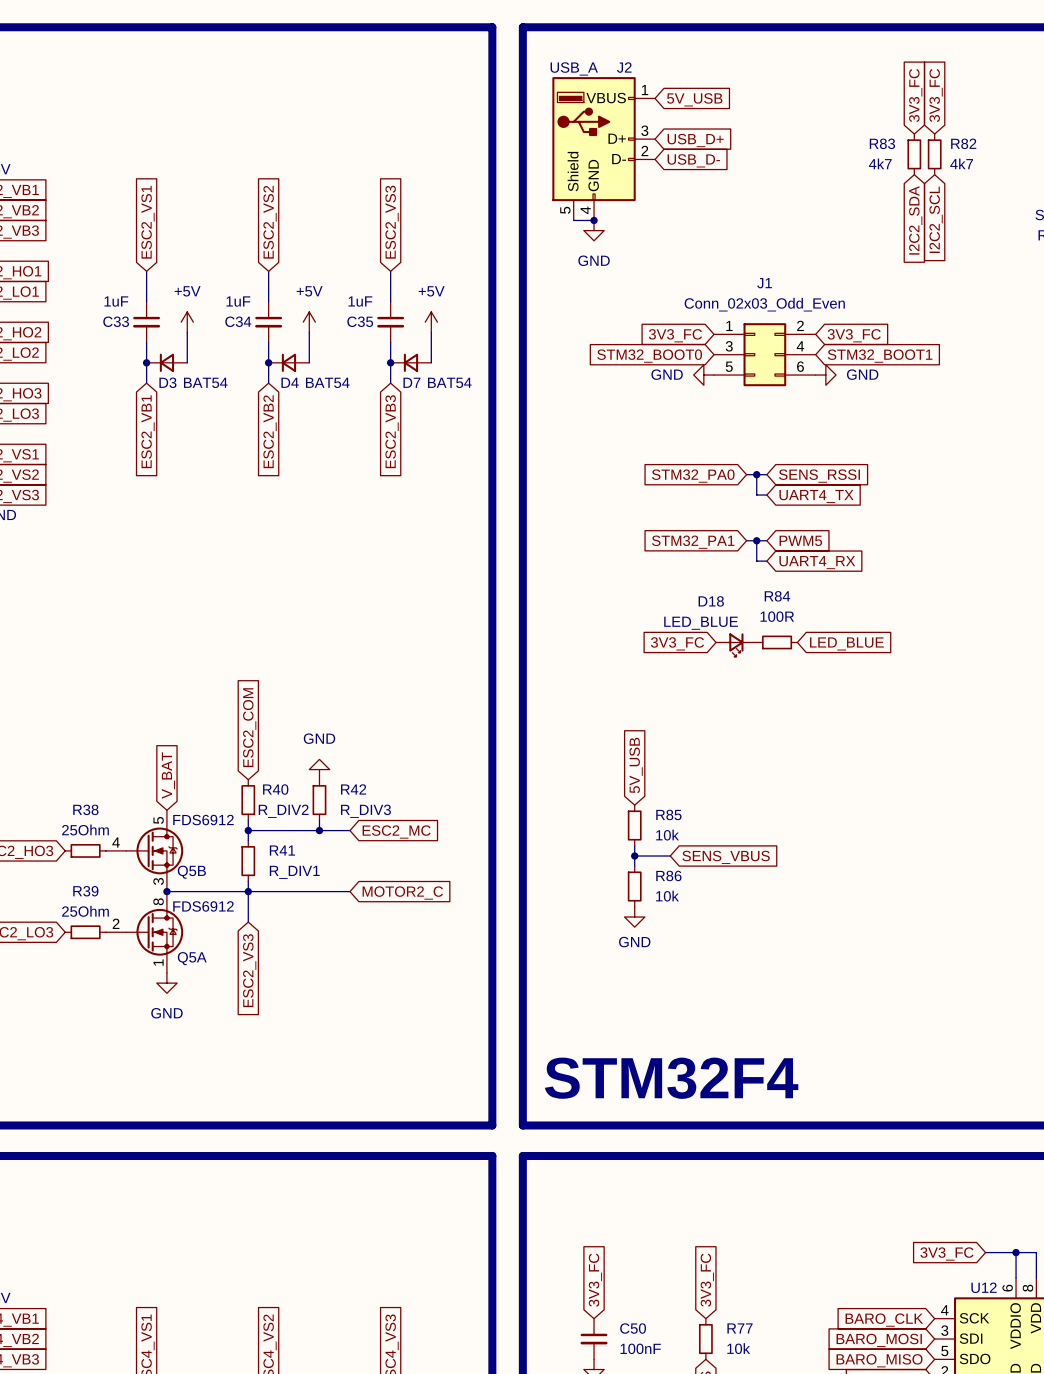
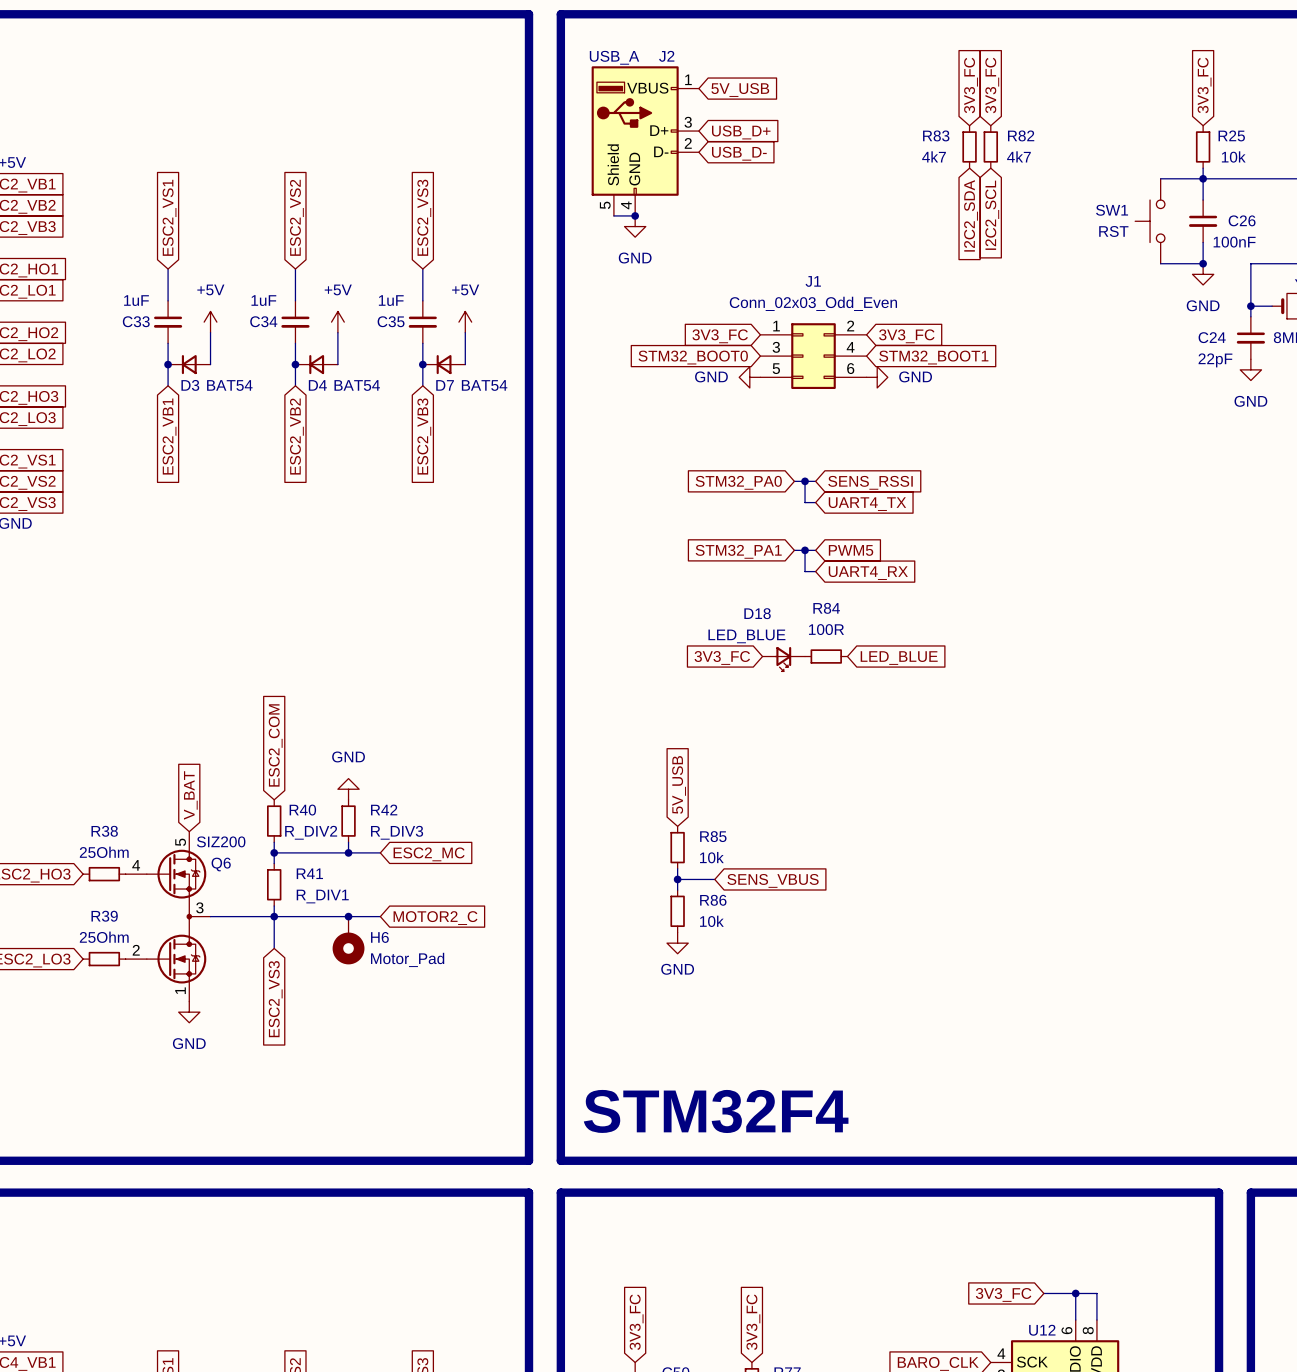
Q5B: FDS6912 (144, 850) -> none
Q6: none -> SIZ200 (168, 916)
junction: (166, 891) -> none
junction: none -> (348, 916)
H6: none -> Motor_Pad (348, 940)
Q5A: FDS6912 (144, 932) -> none

